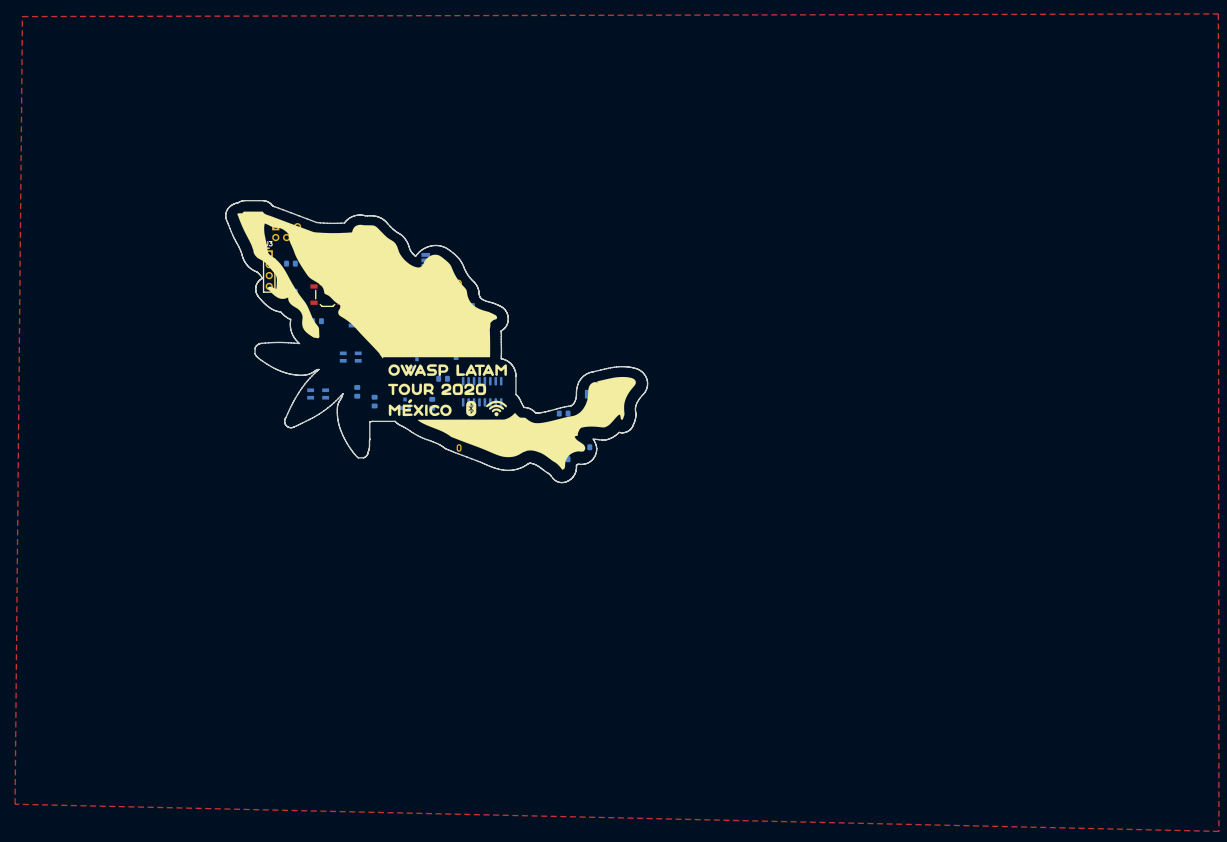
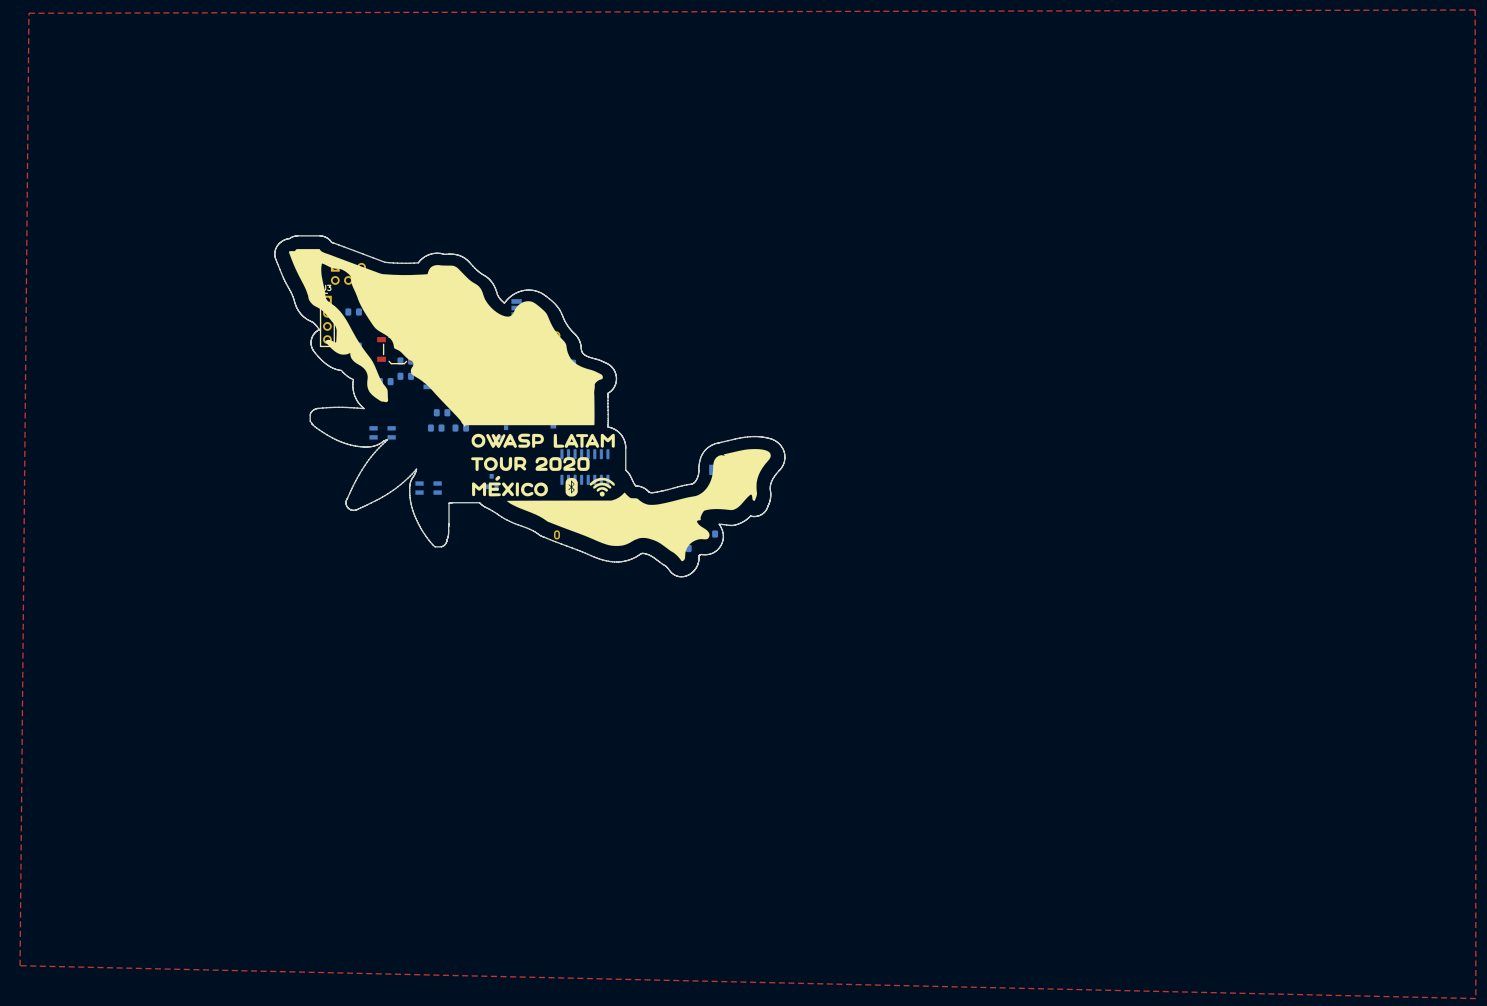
part: none -> (405, 361)
part: none -> (405, 376)
part: none -> (442, 412)
part: (350, 357) -> none
part: none -> (436, 428)
part: none -> (460, 428)
part: none -> (382, 432)
part: (443, 378) -> none
part: (357, 391) -> none
part: (318, 394) -> none
part: (374, 401) -> none
part: (432, 403) -> none
part: none -> (428, 488)
part: (563, 413) -> none

